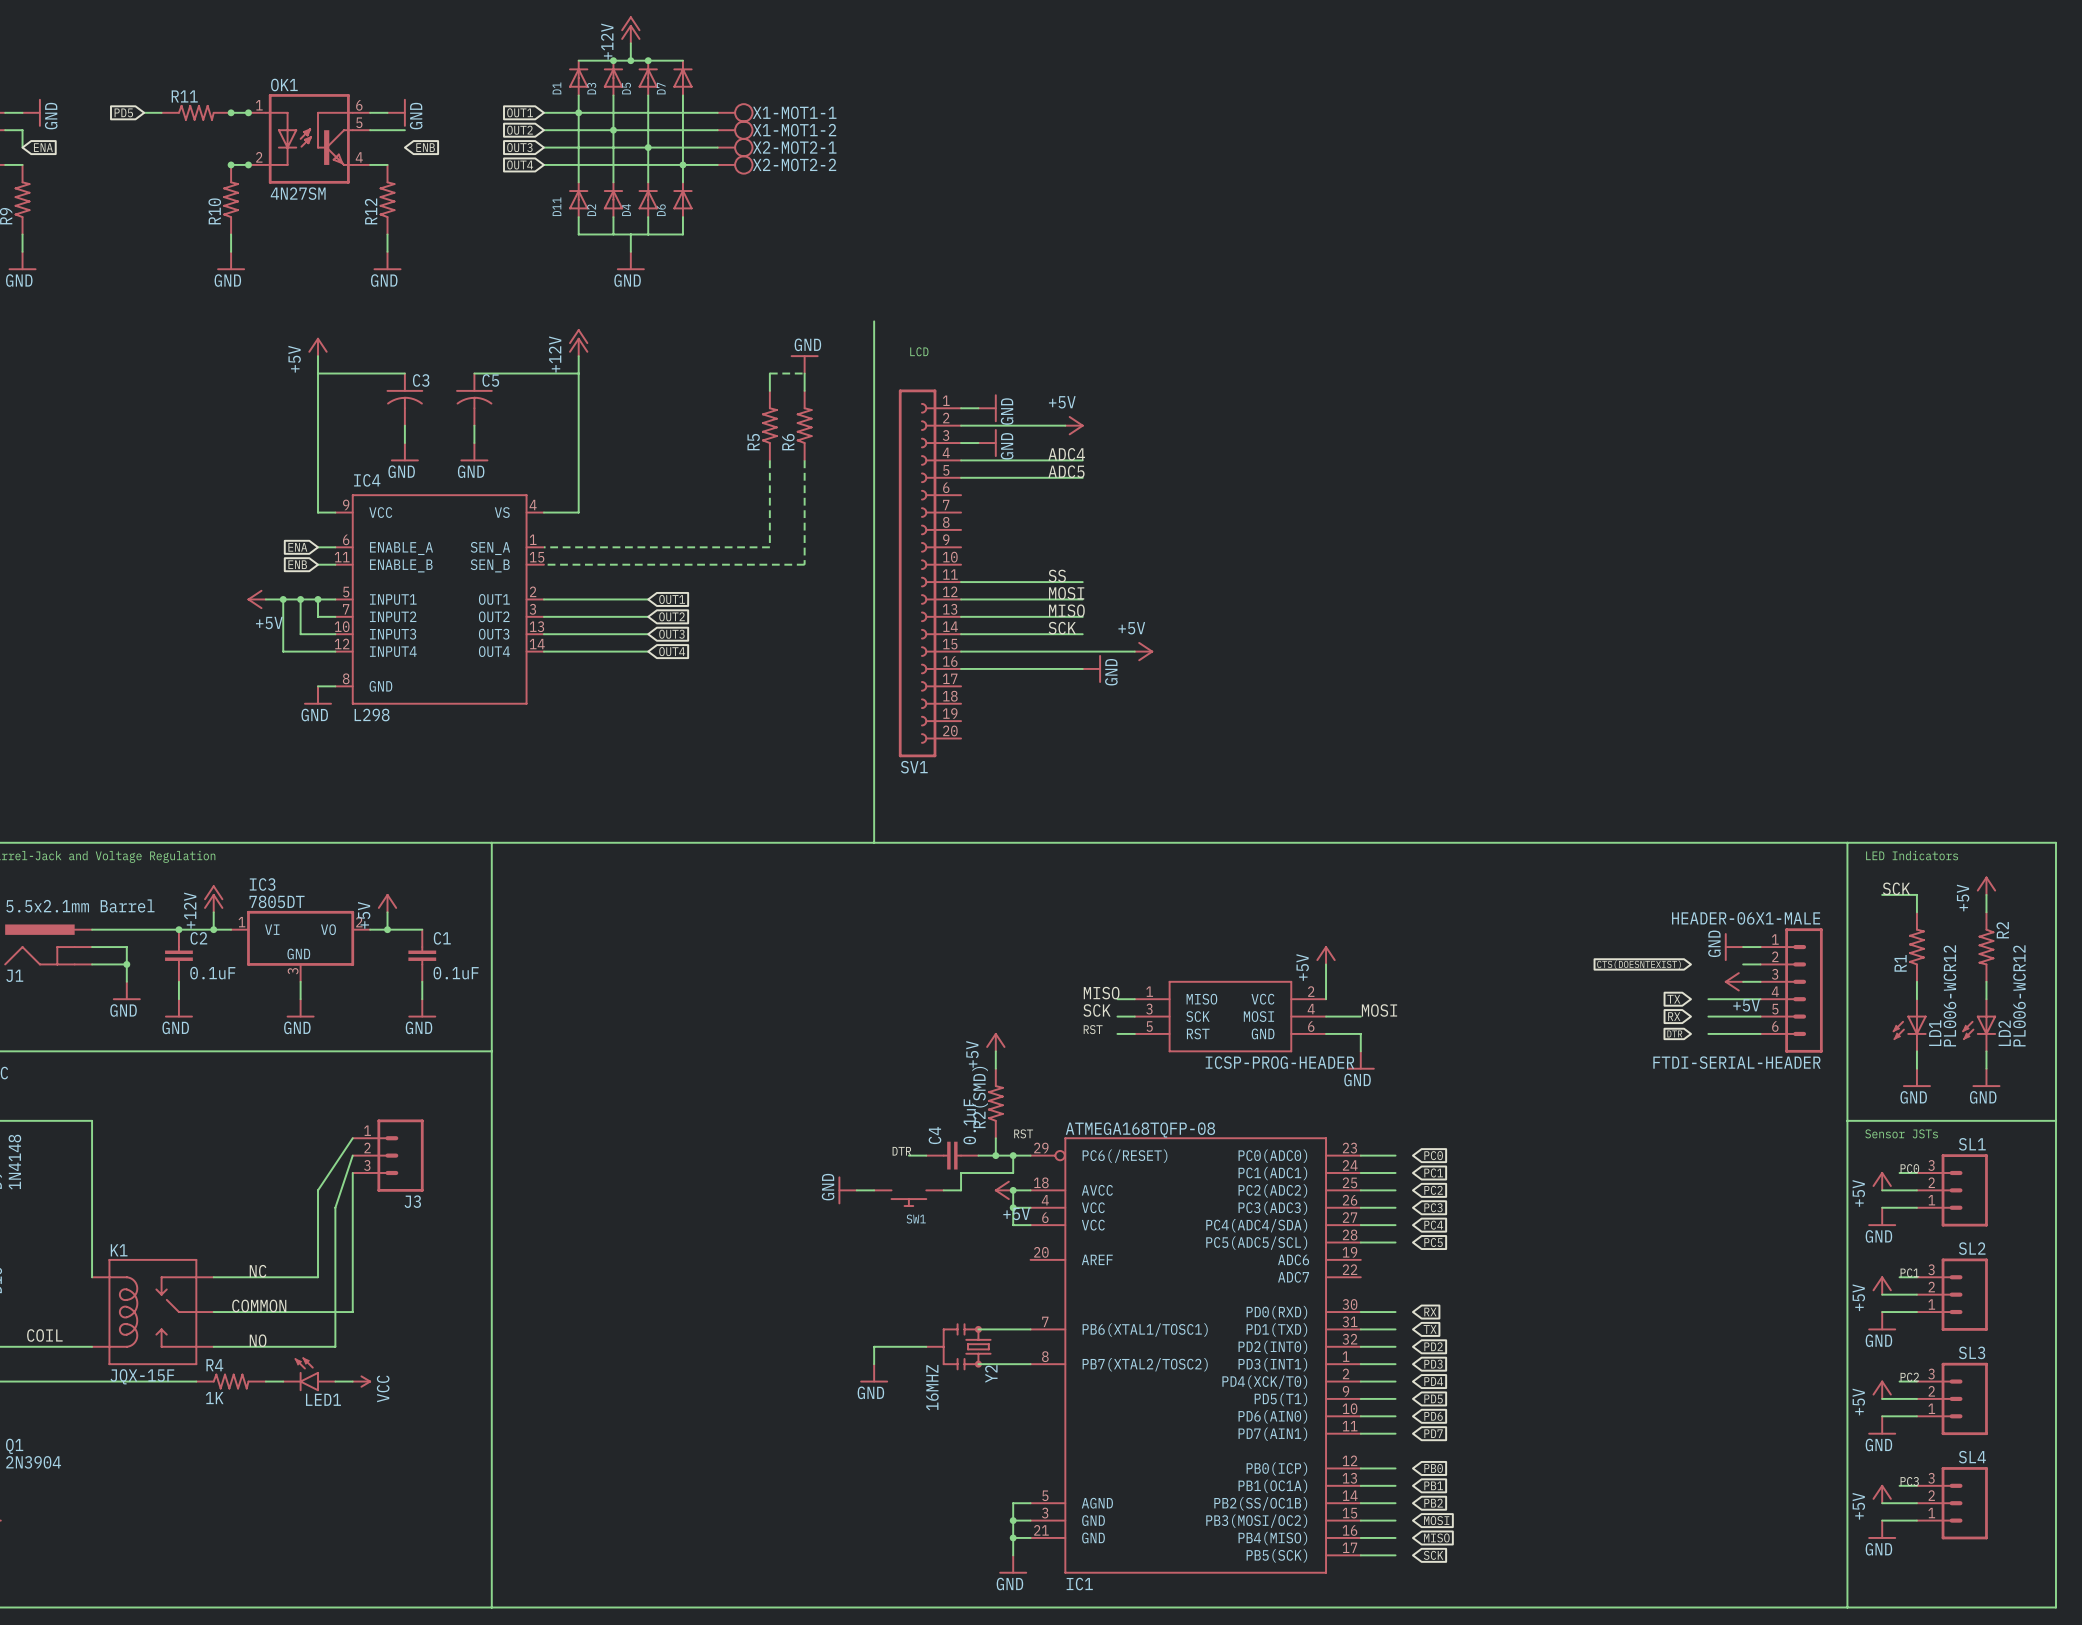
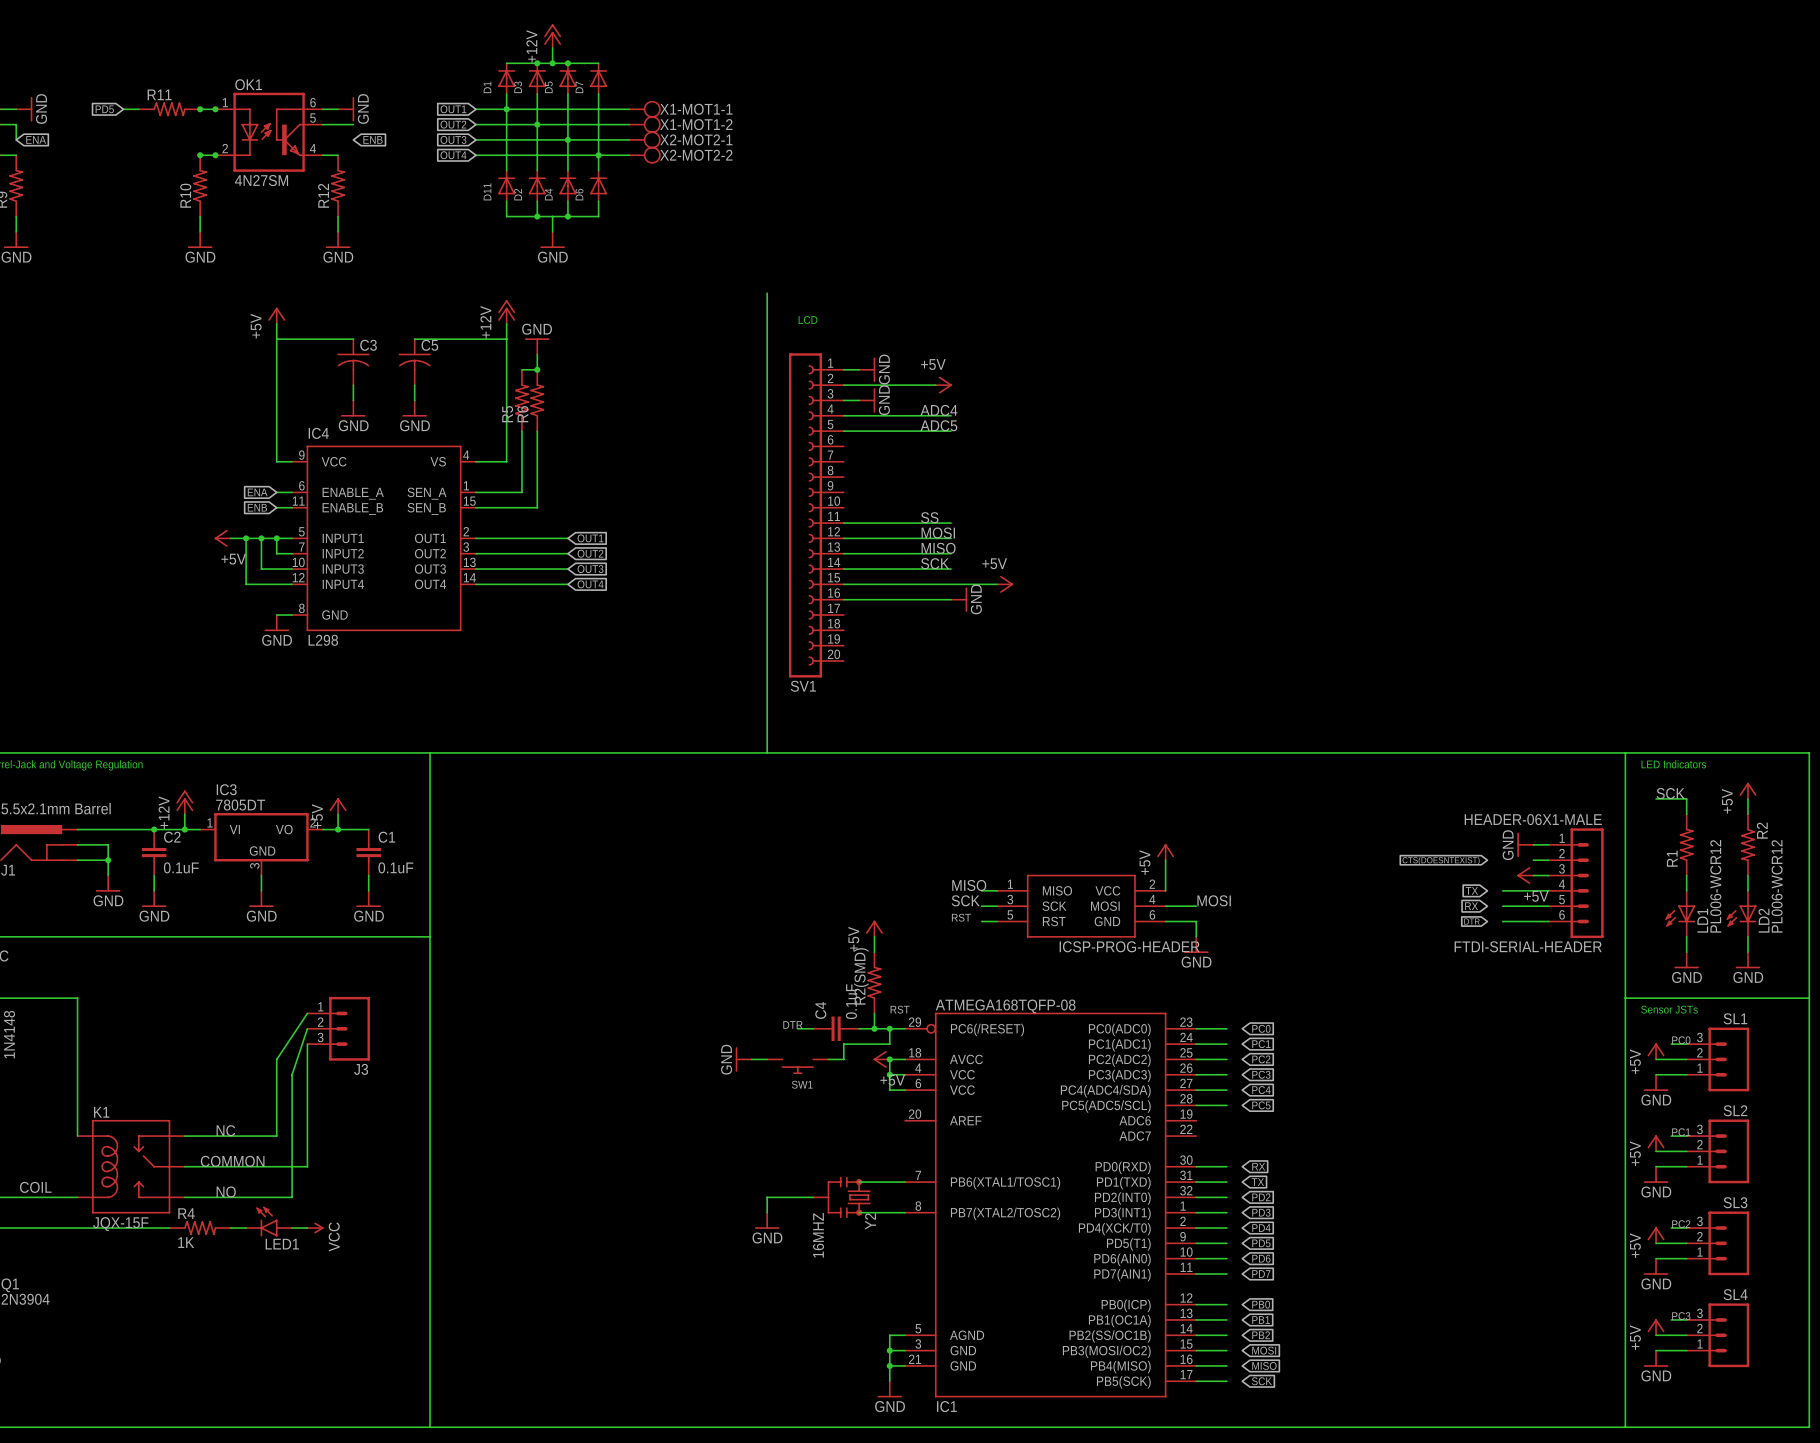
junction: none -> (537, 216)
junction: none -> (567, 216)
power symbol: GND (804, 364) -> none
power symbol: none -> GND (537, 346)
wire: none -> (537, 354) (537, 369) (521, 369)
wire: (769, 390) (769, 373) (804, 373) (804, 390) -> none
junction: none -> (537, 369)
R5 position: (769, 425) -> (521, 400)
R6 position: (804, 425) -> (537, 400)
wire: (769, 460) (769, 547) (543, 547) -> (521, 431) (521, 492) (475, 492)
wire: (804, 460) (804, 564) (543, 564) -> (537, 431) (537, 507) (475, 507)

